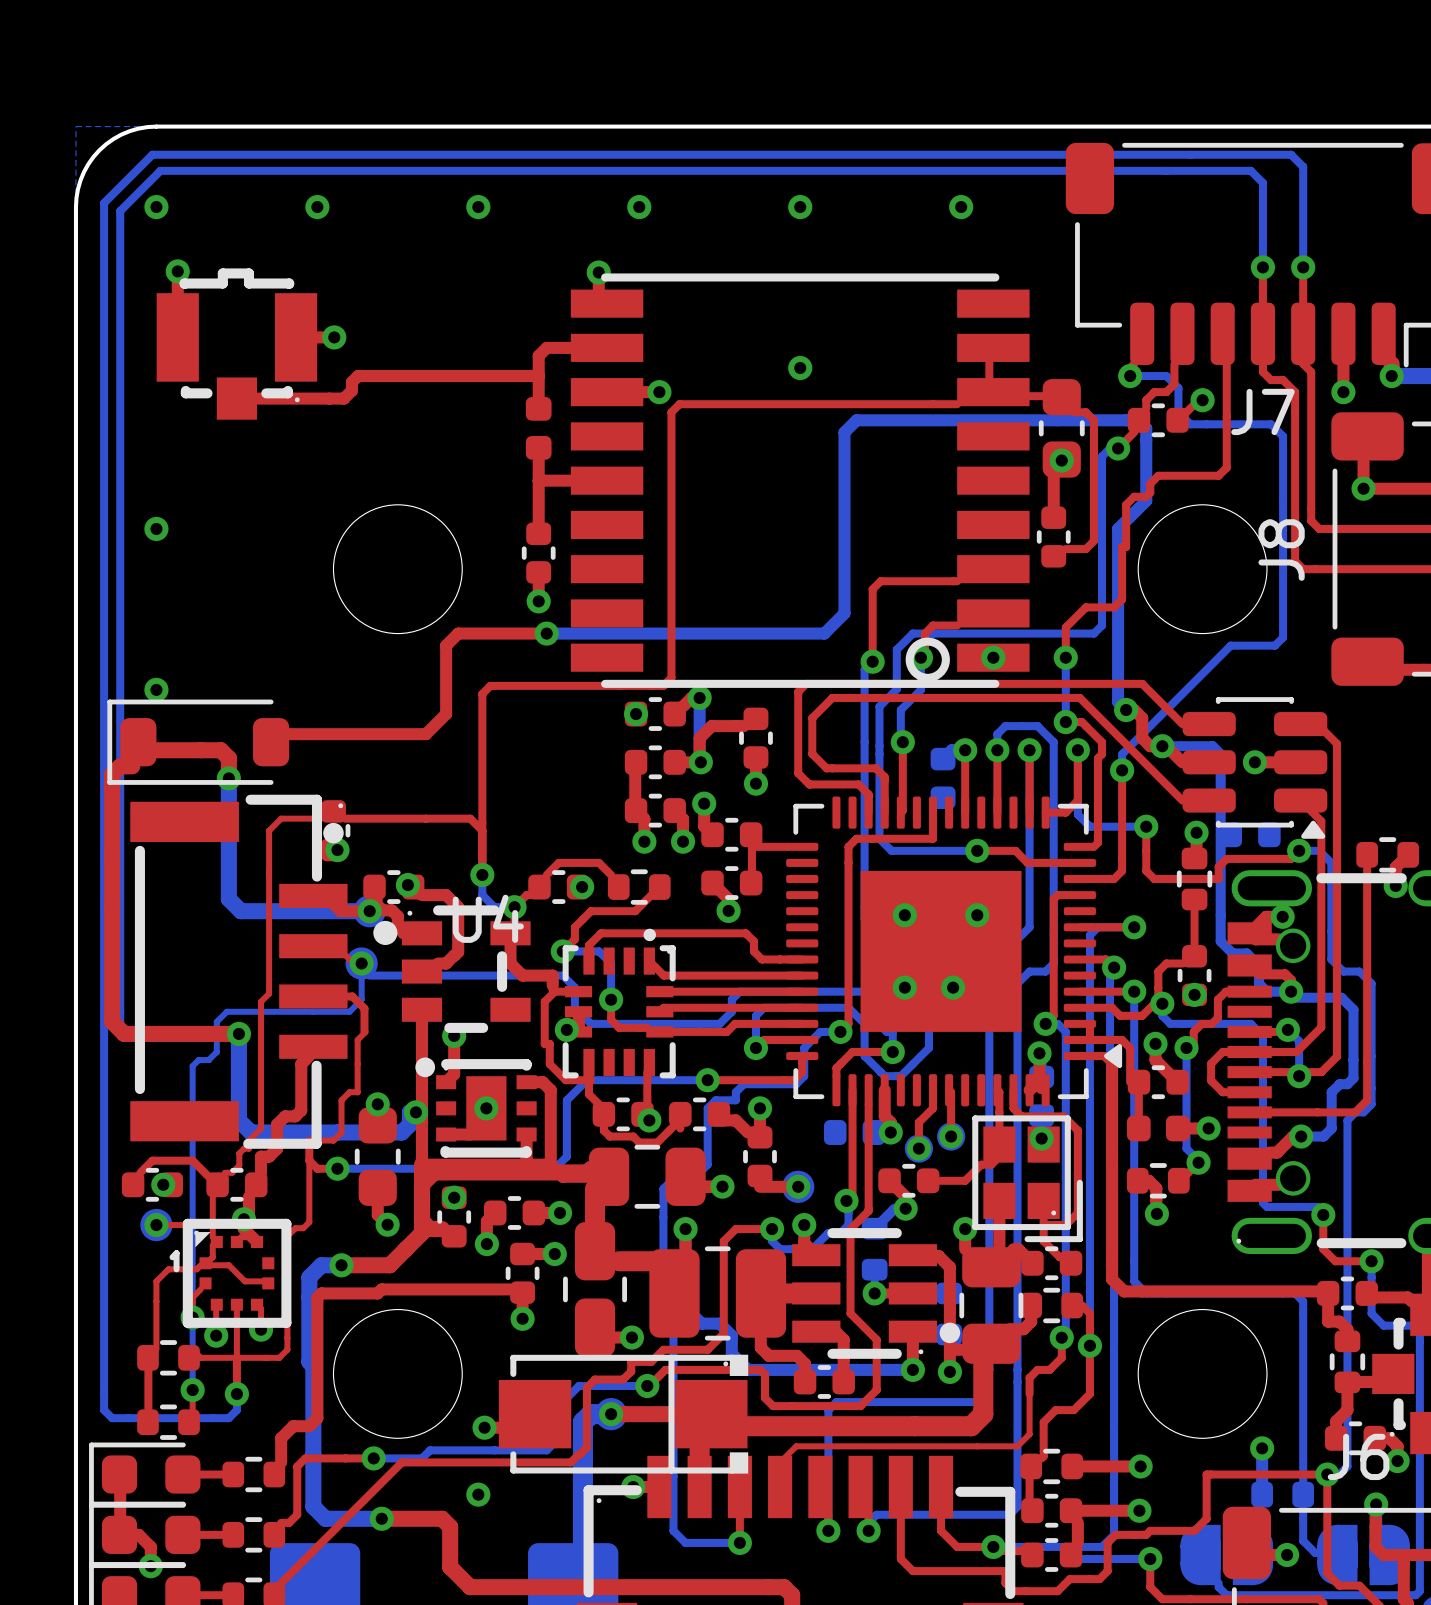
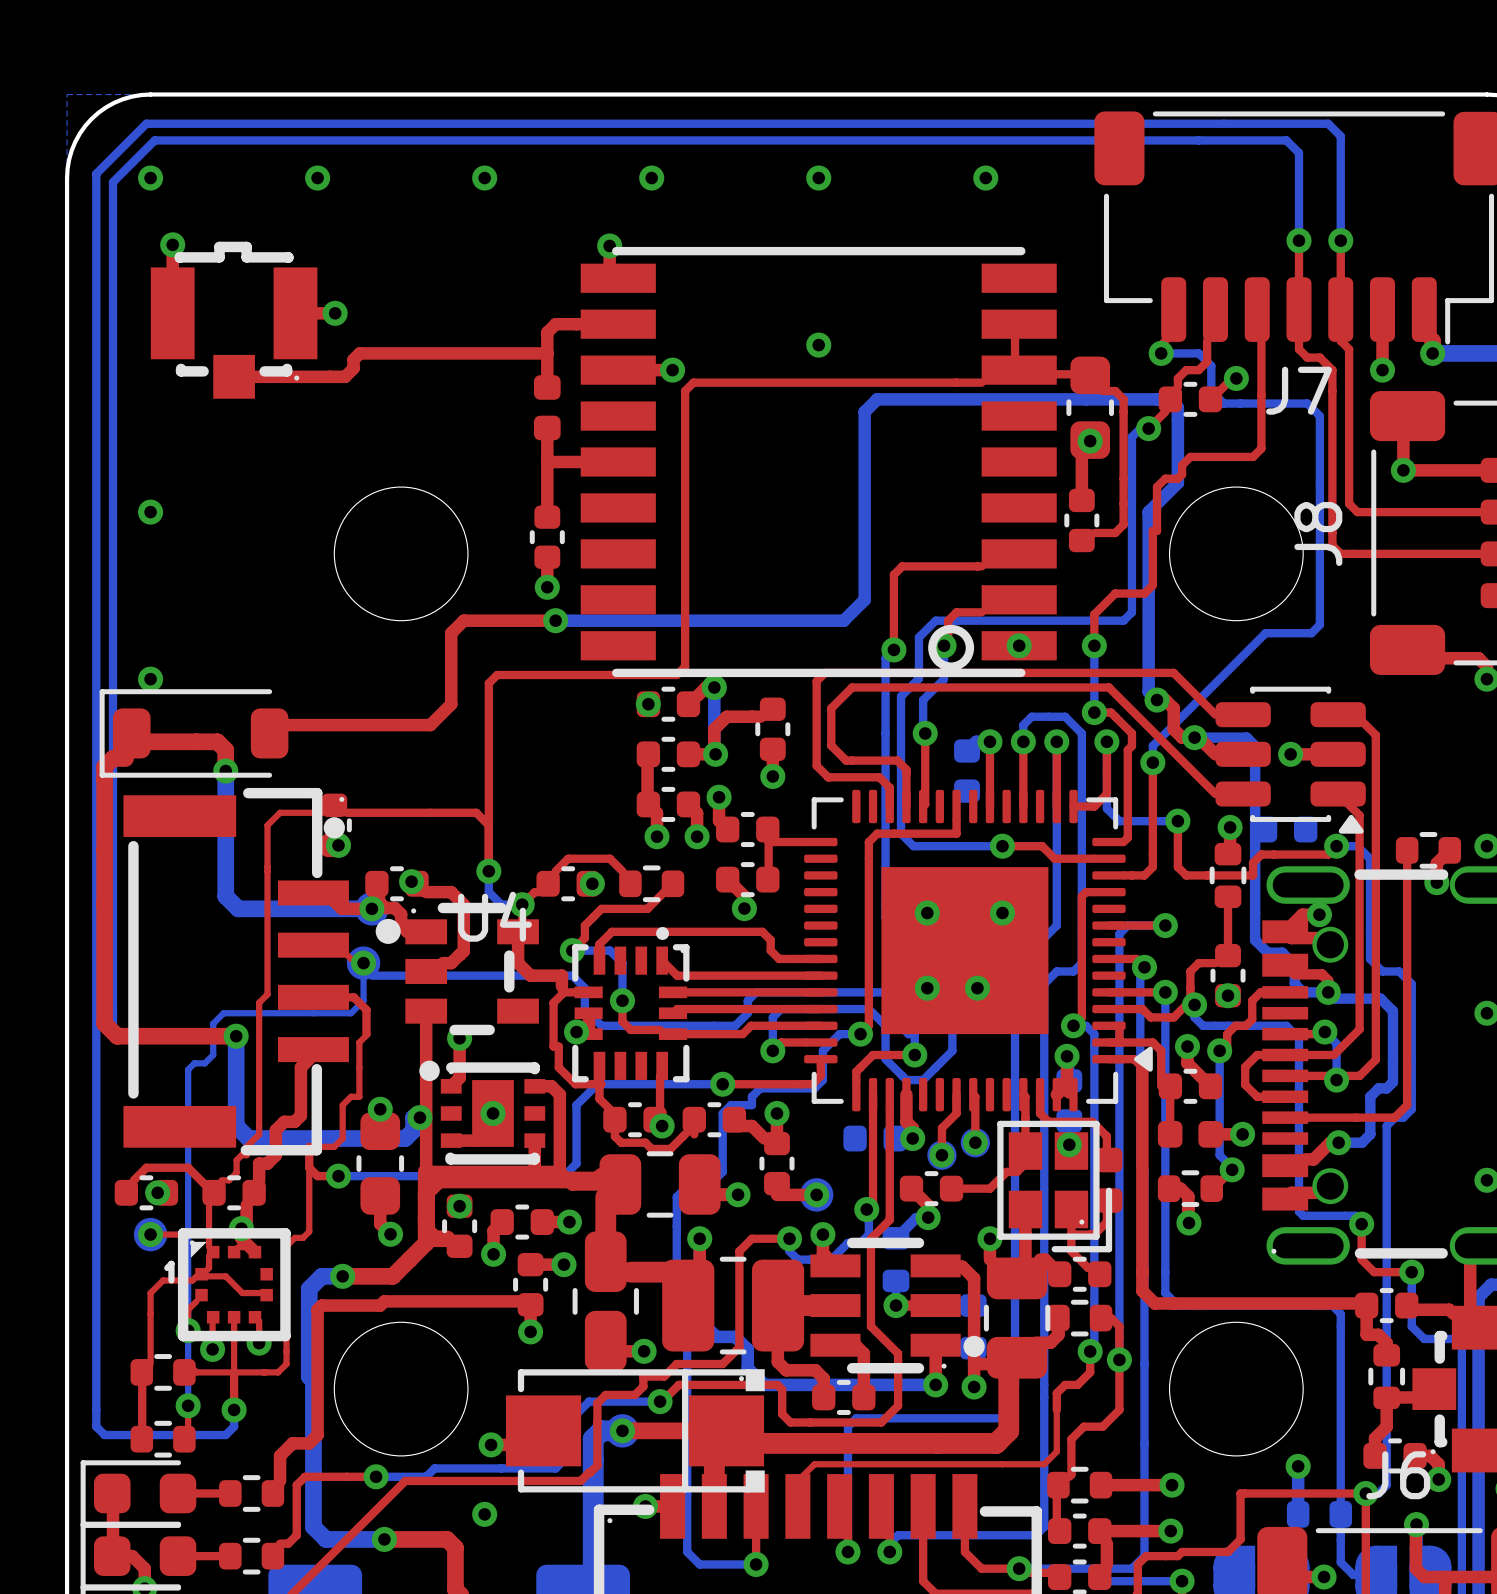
top track: (1077, 1153) (1077, 1192) -> none
part: none -> (1108, 1180)

